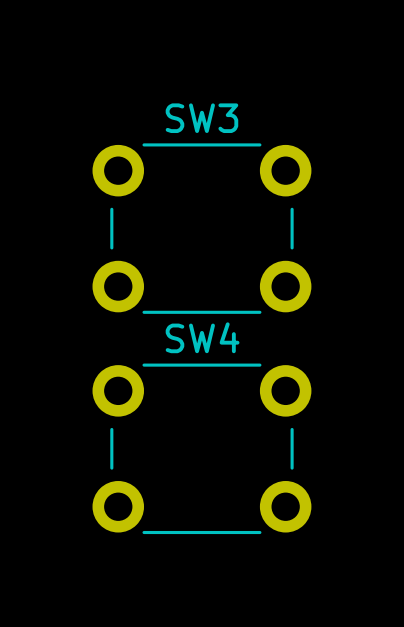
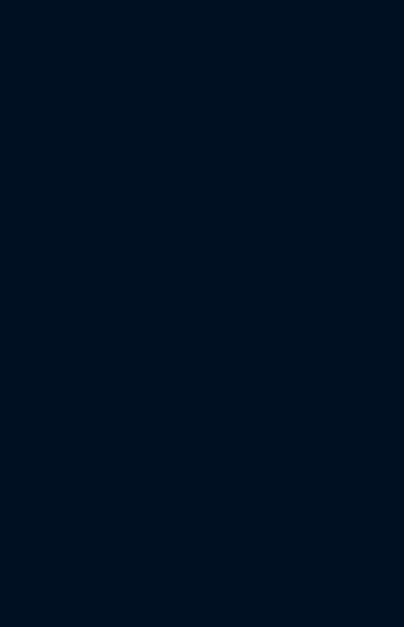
SW3: (201, 228) -> none
SW4: (201, 448) -> none

